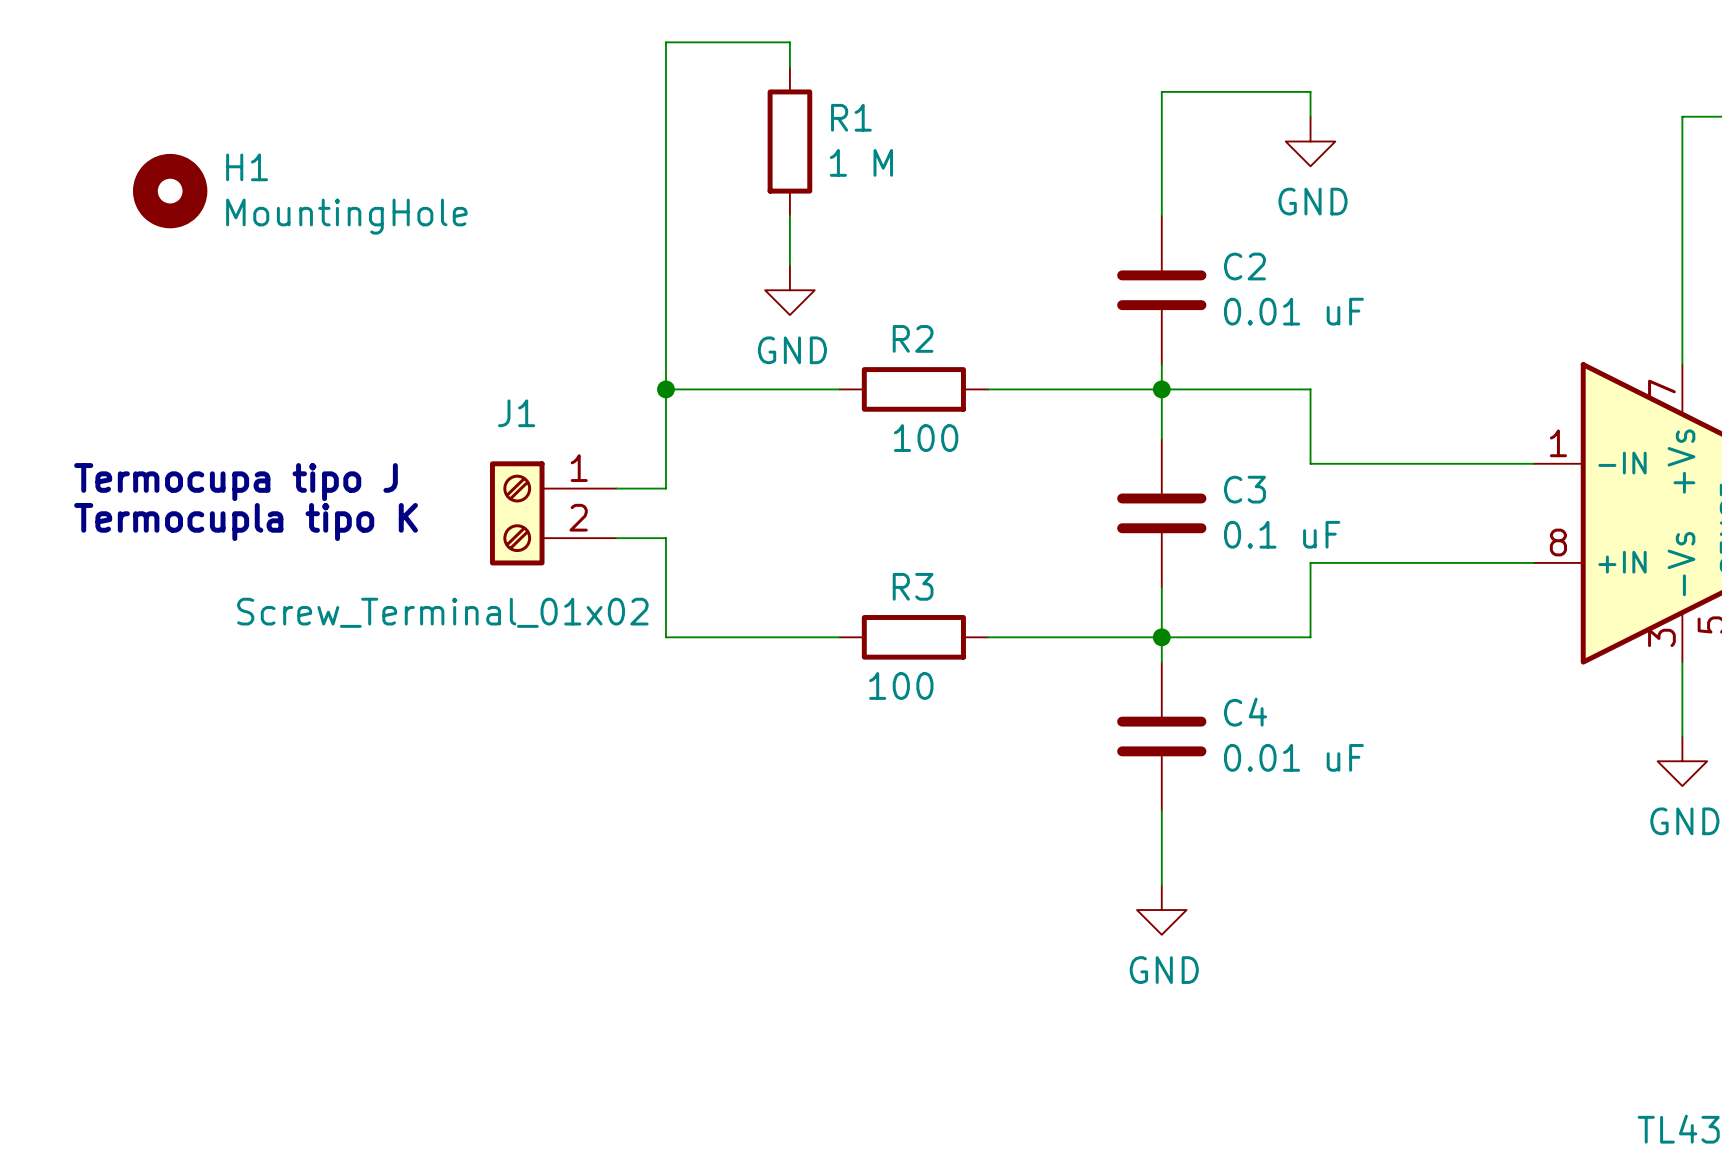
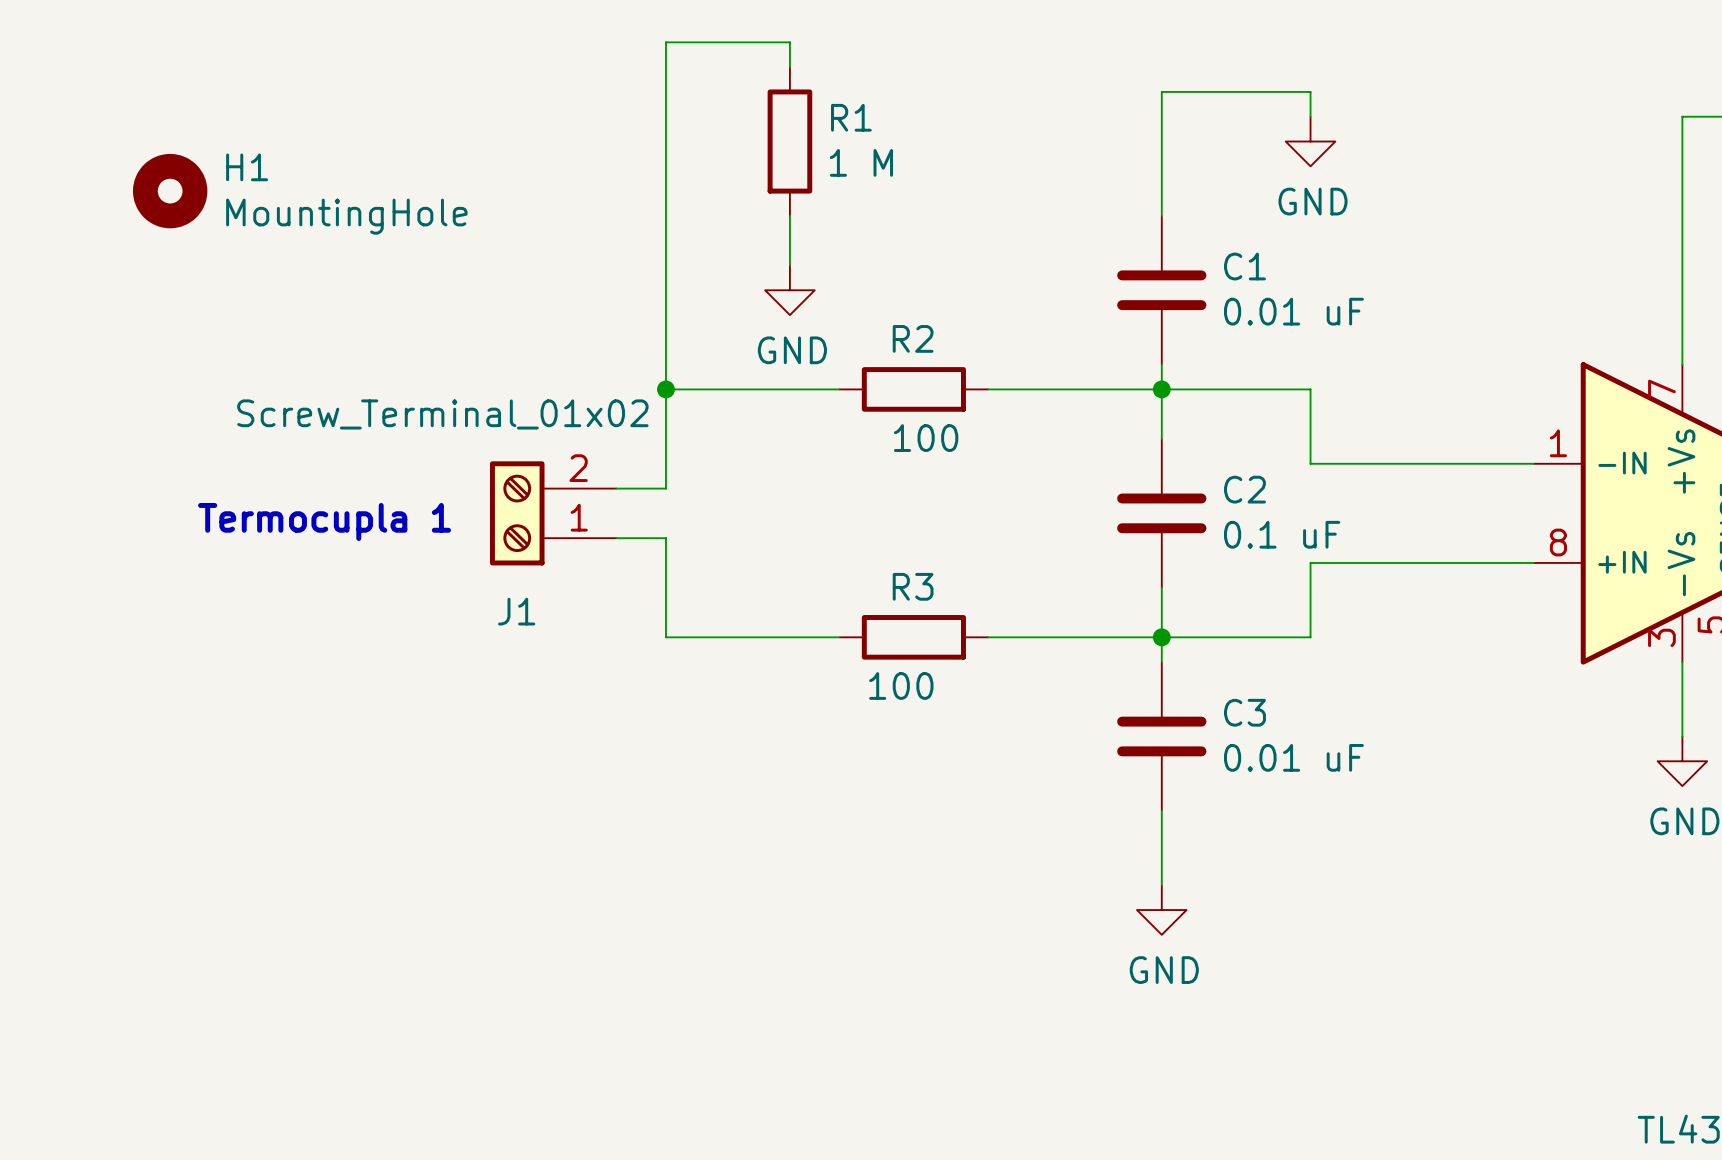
C2 name: C2 (1244, 266) -> C1 (1244, 266)
text: Termocupa tipo J (236, 482) -> none
C3 name: C3 (1244, 489) -> C2 (1244, 489)
J1 flip: as is (517, 513) -> up-down (517, 513)
text: Termocupla tipo K (246, 521) -> none
text: none -> Termocupla 1 (324, 521)
C4 name: C4 (1245, 712) -> C3 (1244, 712)

